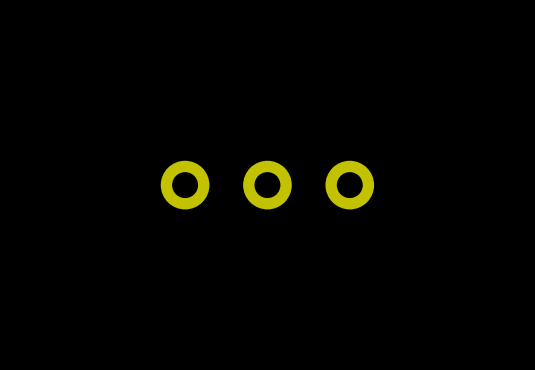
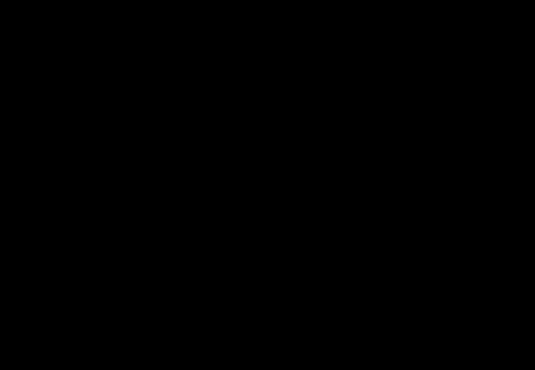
part: (267, 185) -> none

